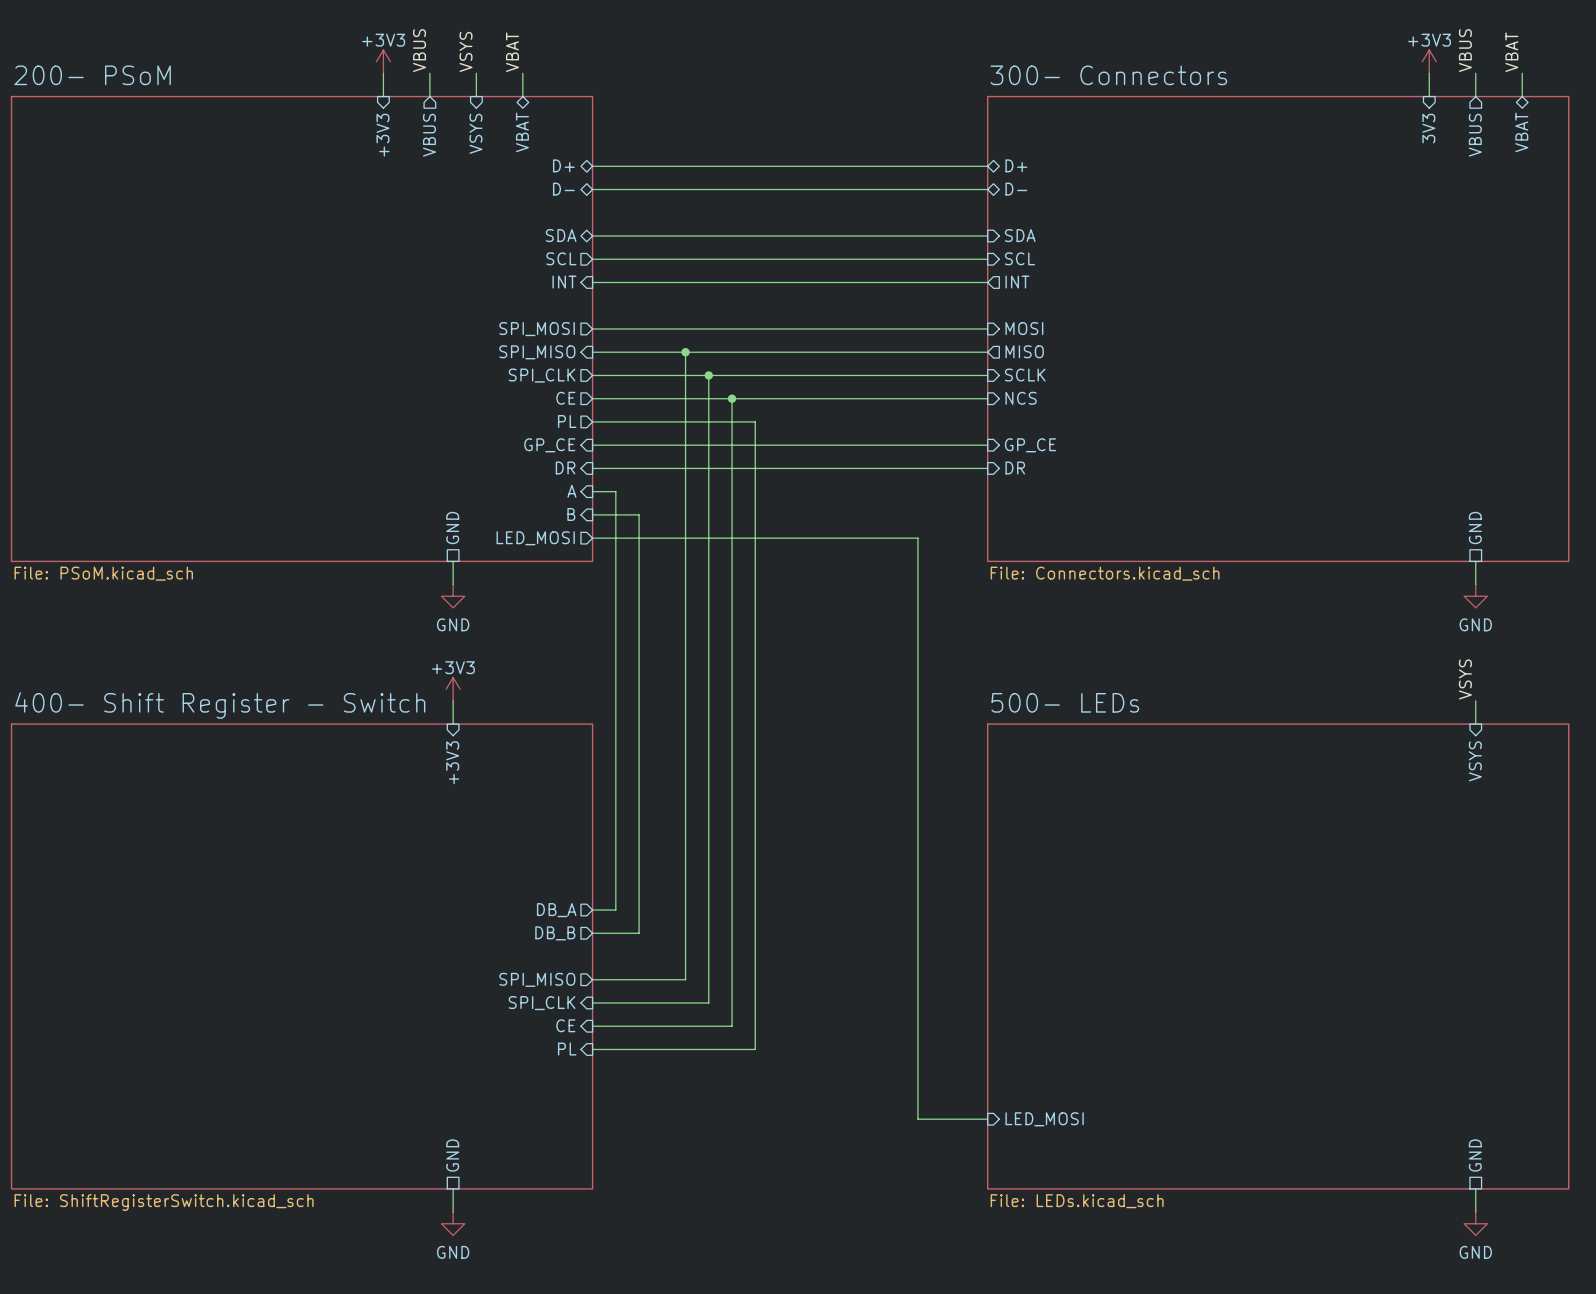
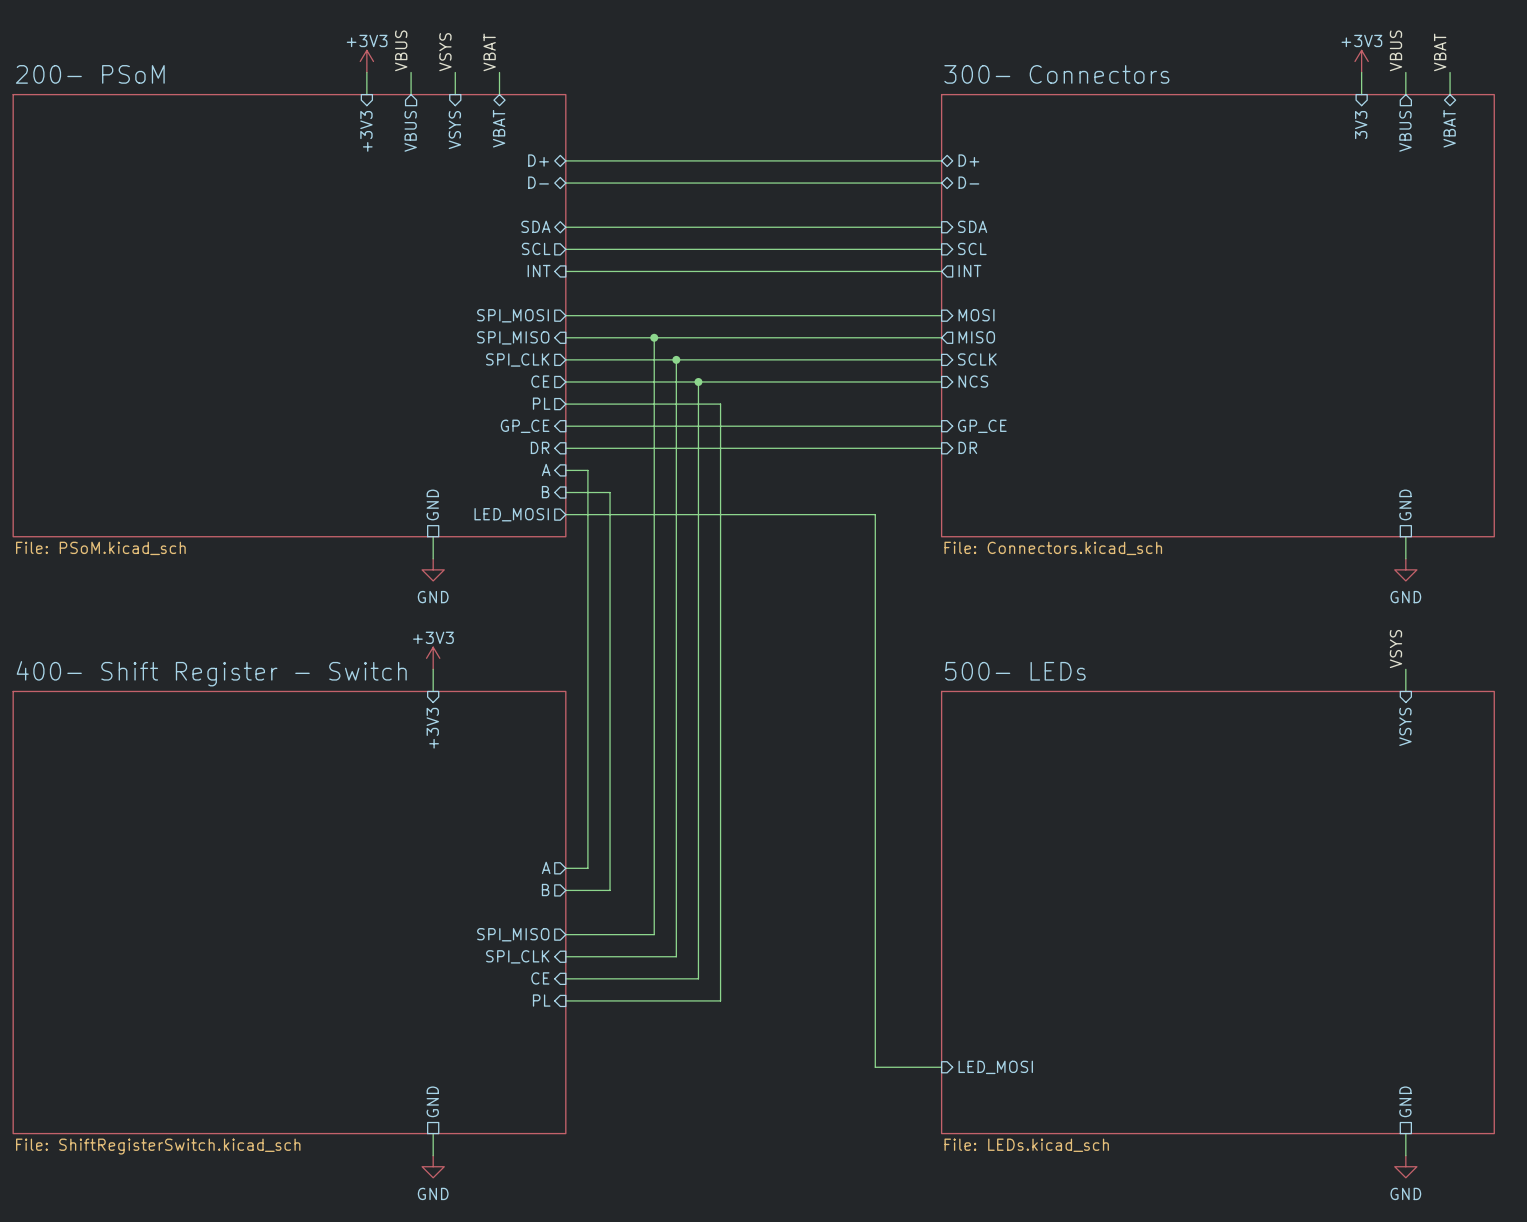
sheet pin: DB_A (556, 910) -> A (546, 867)
sheet pin: DB_B (555, 933) -> B (545, 890)

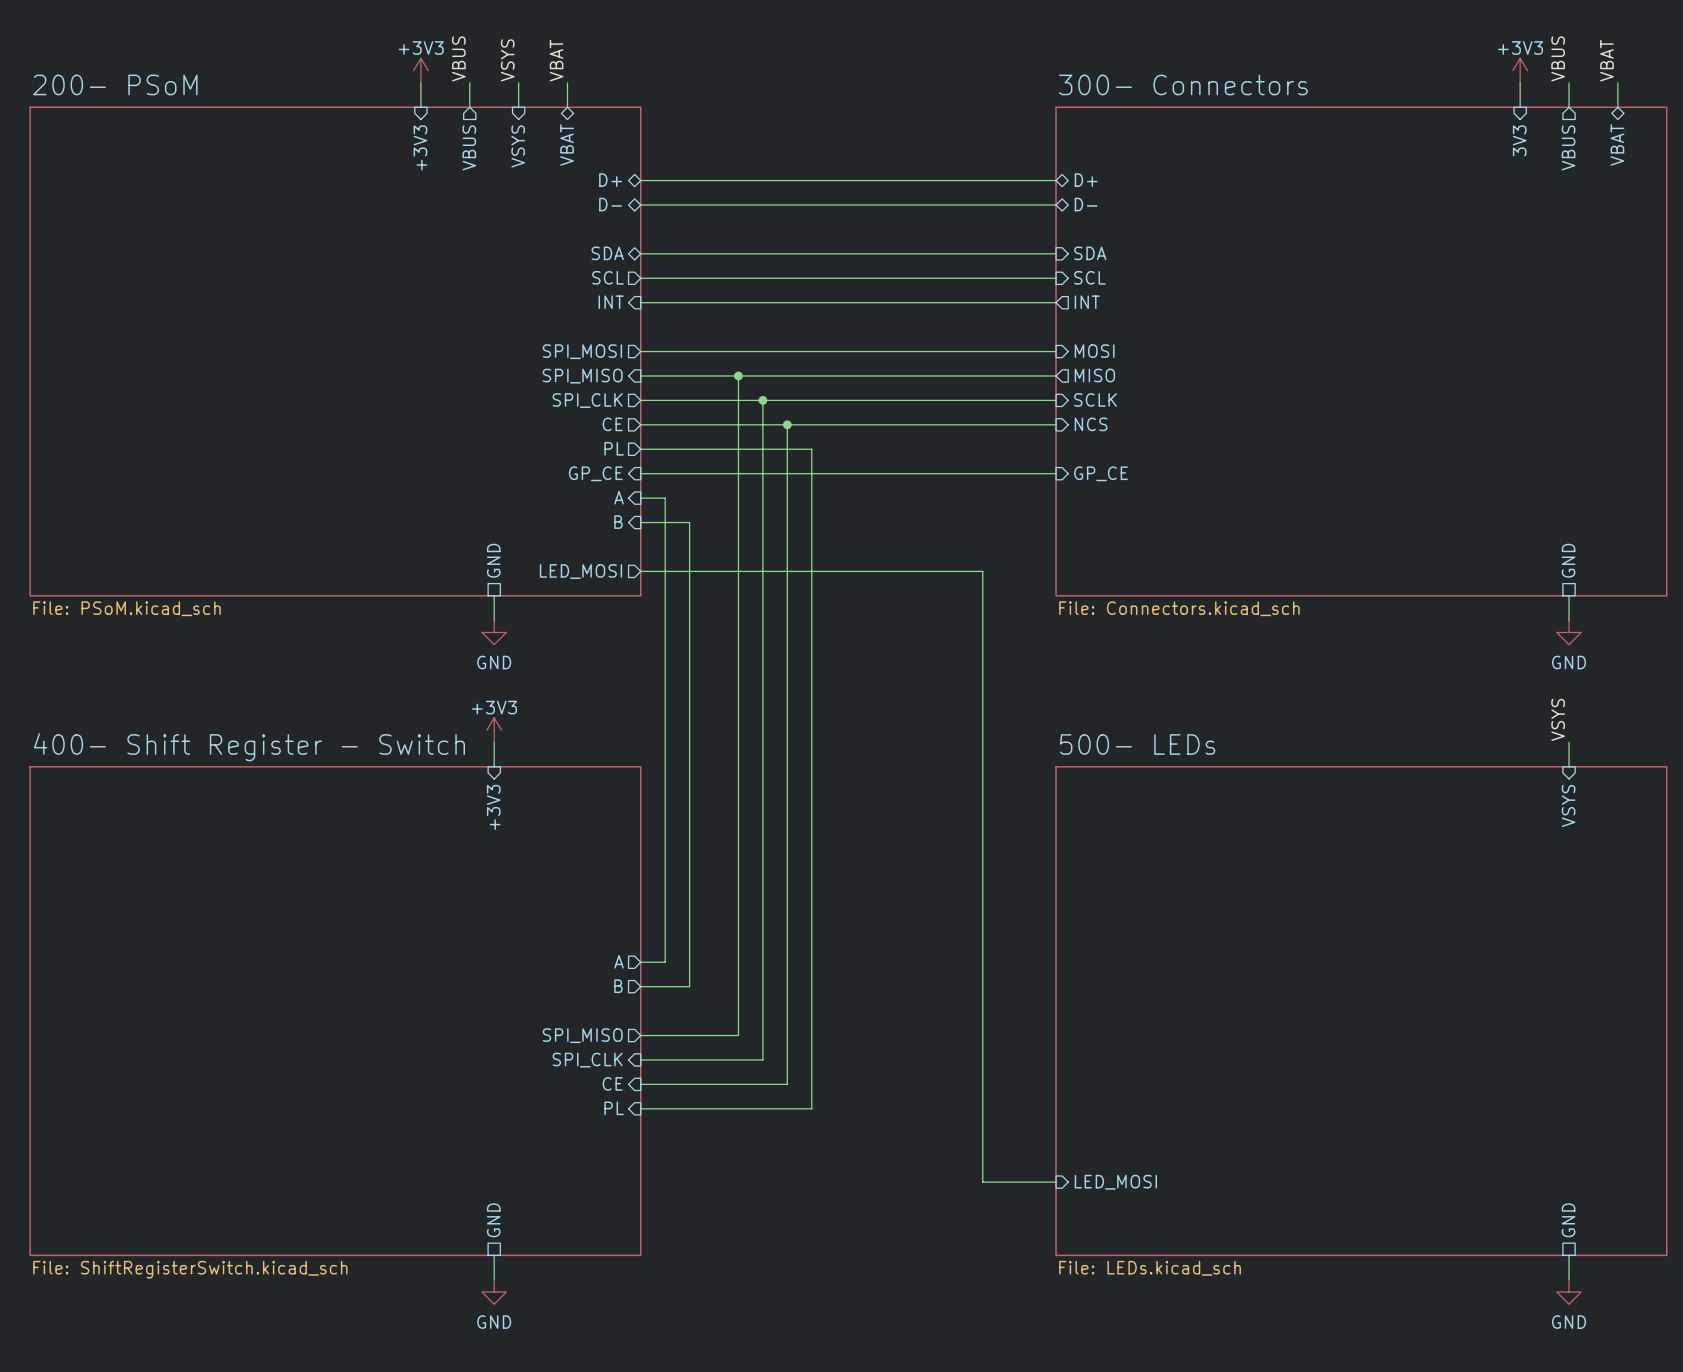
sheet pin: DR (540, 447) -> A (619, 497)
sheet pin: DR (967, 447) -> none
wire: (587, 448) (941, 448) -> none
sheet pin: A (546, 469) -> B (618, 522)
sheet pin: B (545, 492) -> none
wire: (565, 492) (610, 492) -> (665, 498) (665, 522) (689, 522) (689, 546)

